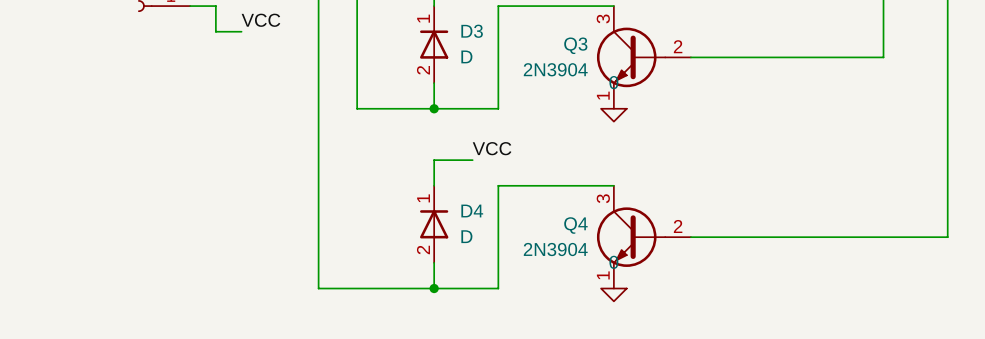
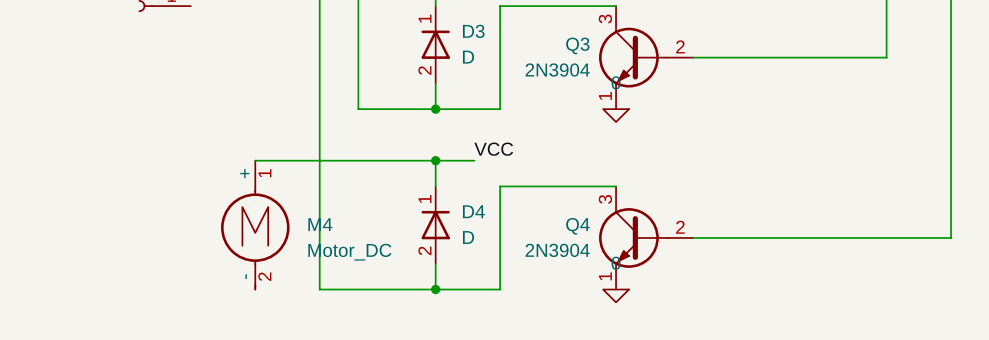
wire: (190, 6) (215, 6) (215, 31) (241, 31) -> none
label: VCC (260, 20) -> none
wire: none -> (255, 160) (435, 160)
junction: none -> (435, 160)
M4: none -> Motor_DC (255, 225)

